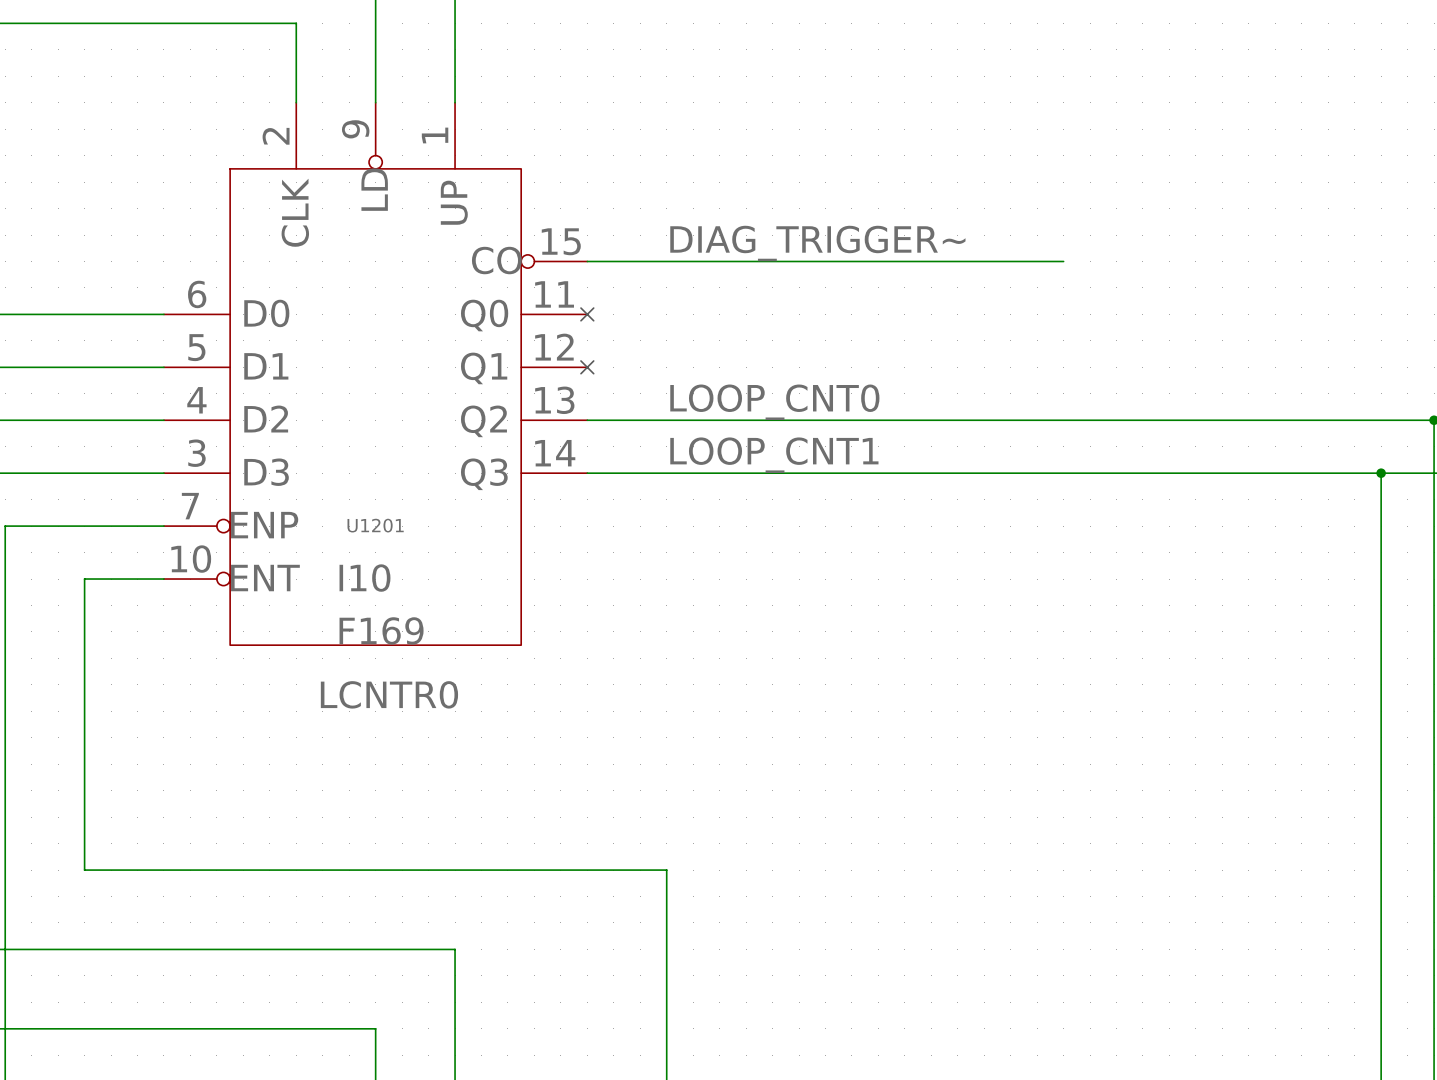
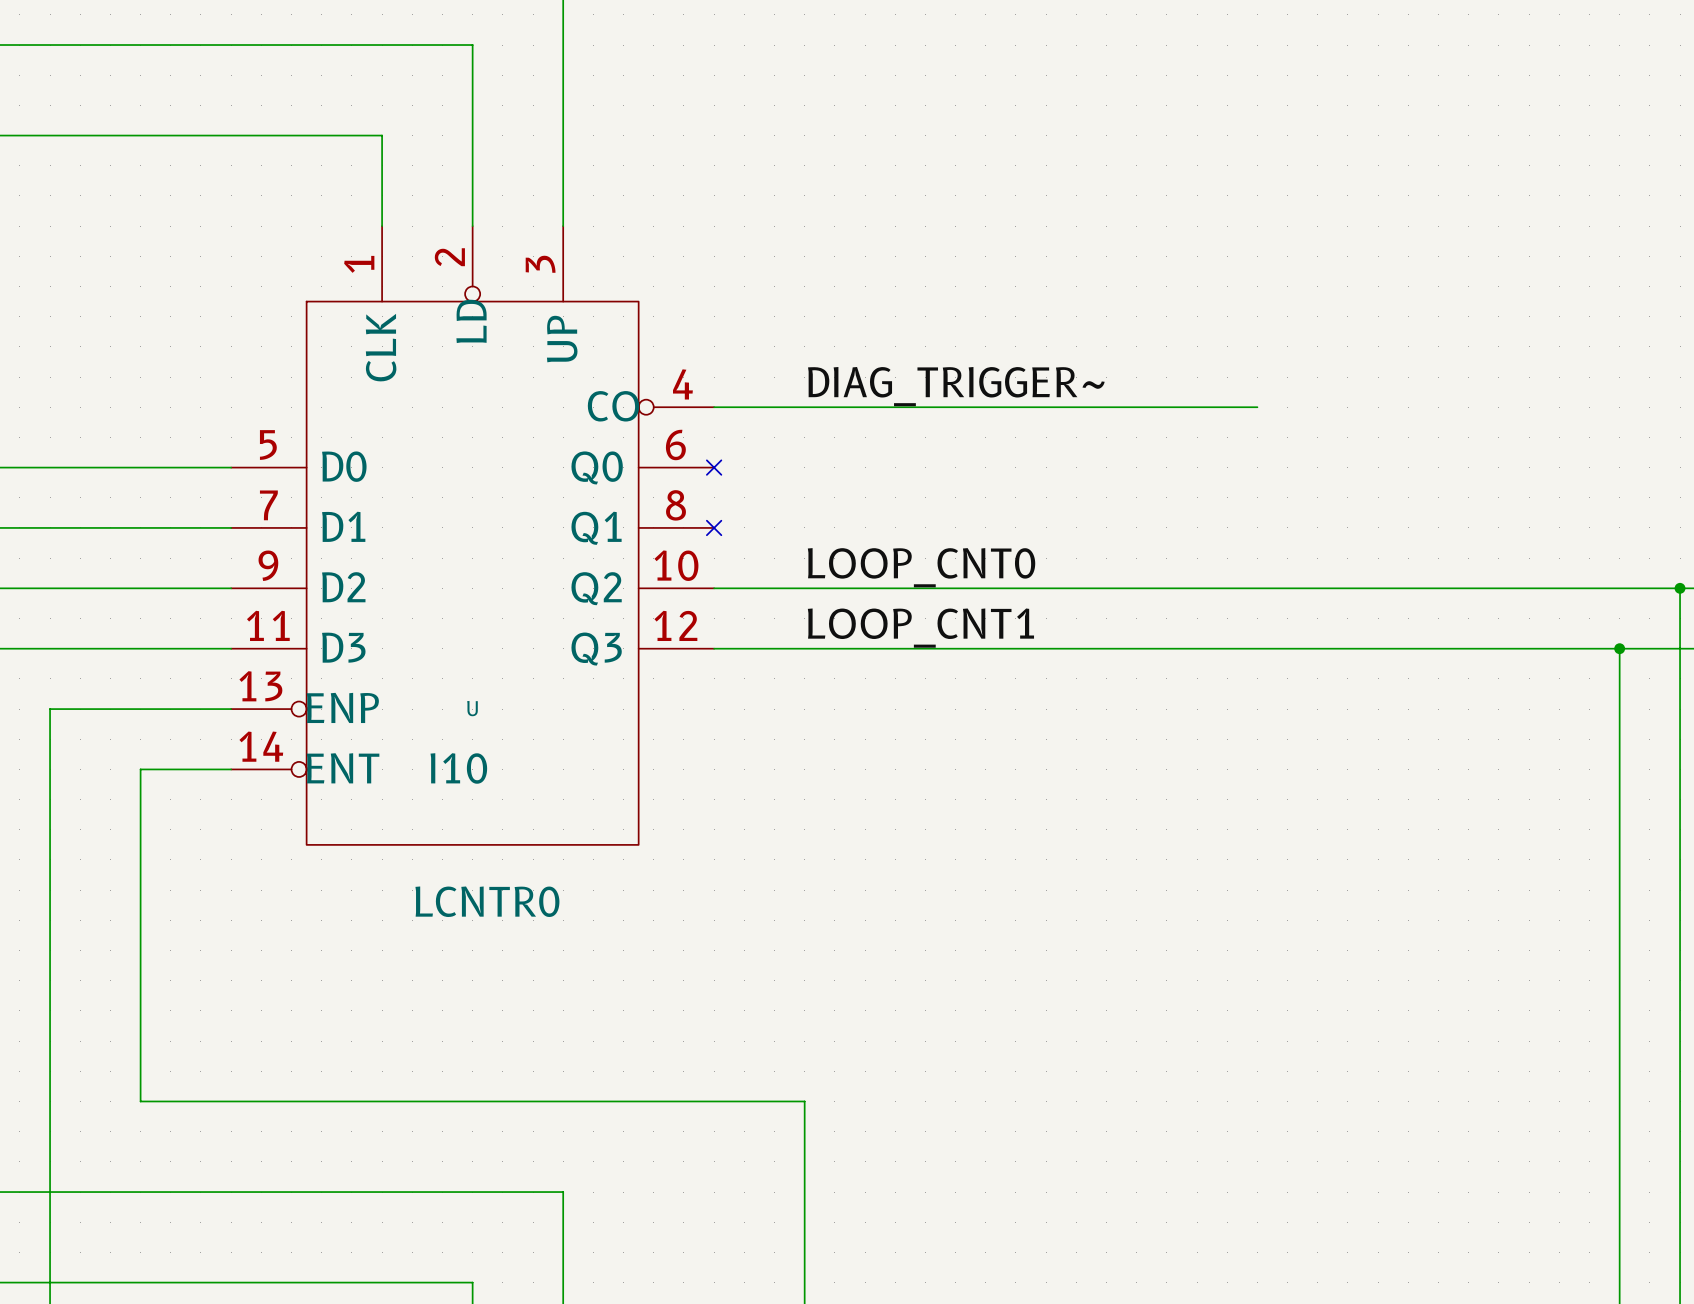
U1201 symbol: [163, 102, 588, 646] -> [231, 226, 715, 845]
U1201 name: U1201 (375, 525) -> U (472, 708)
U1201 value: F169 (381, 630) -> none

